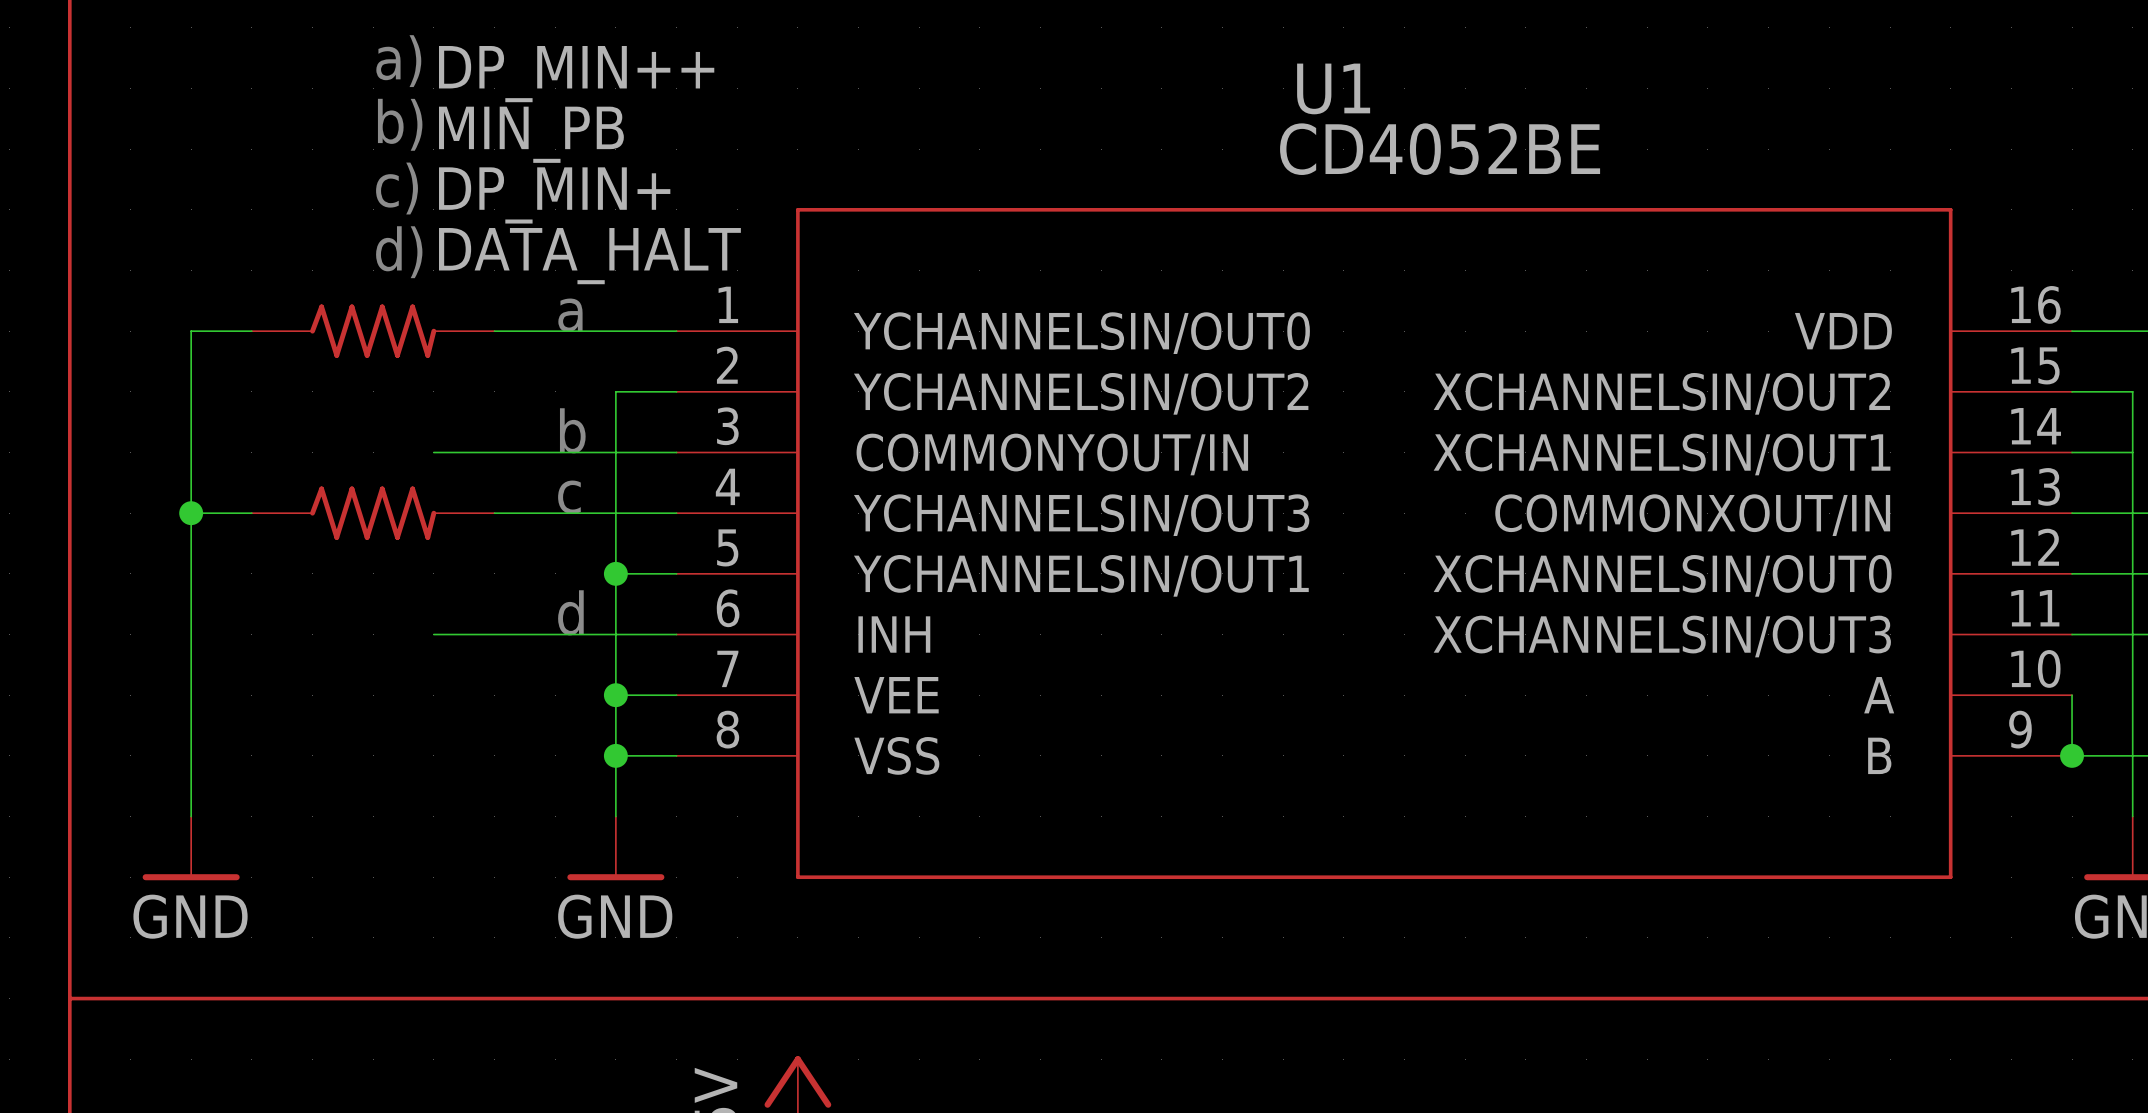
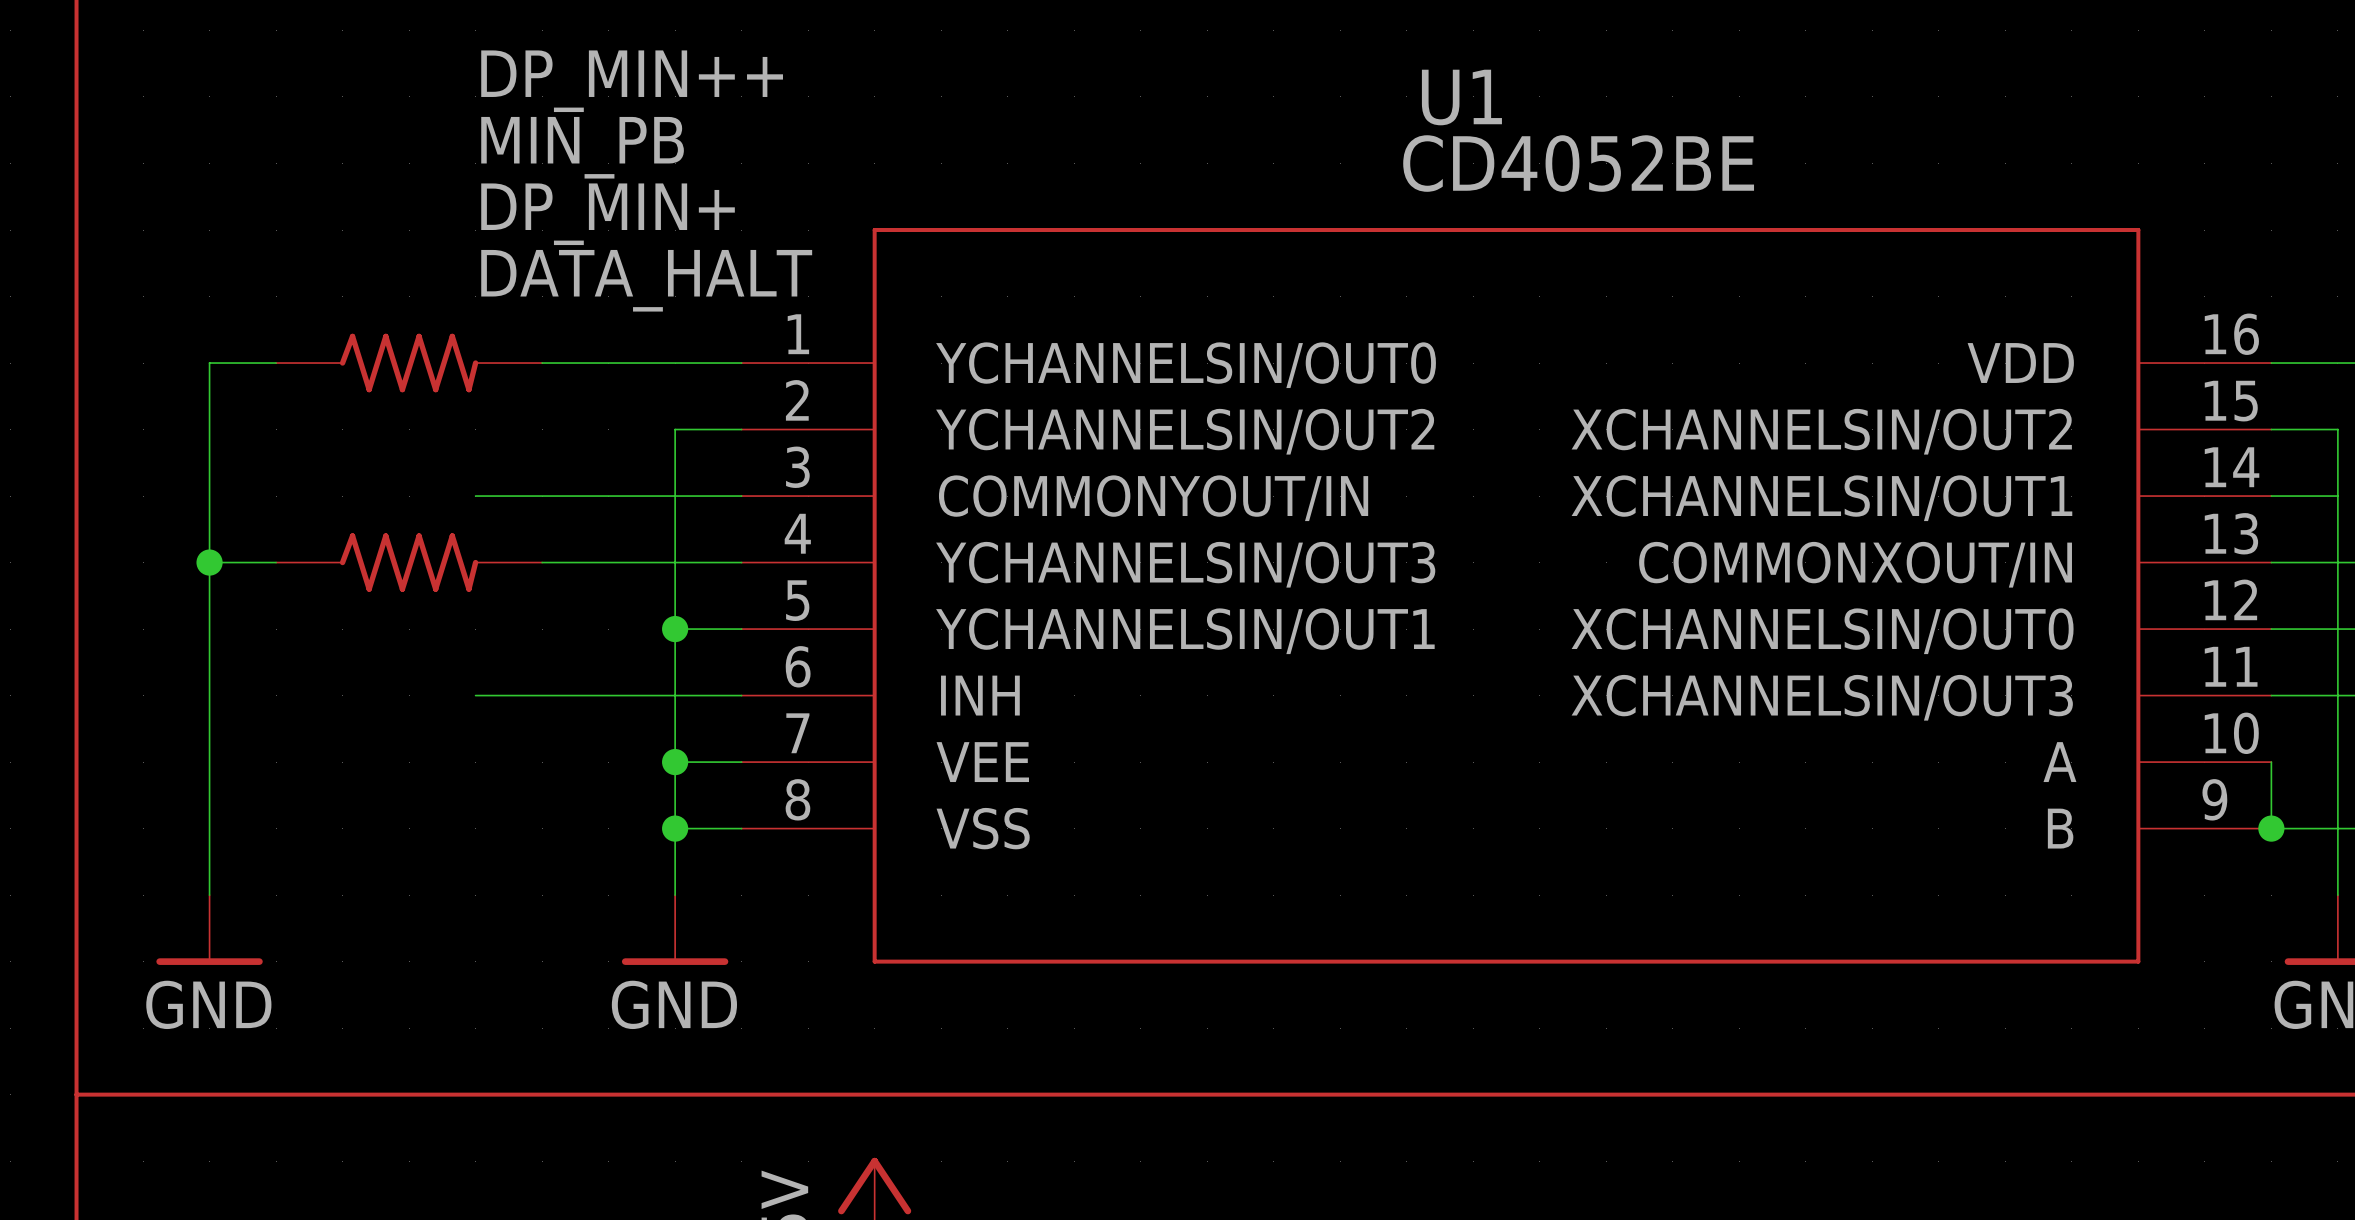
text: a) (398, 61) -> none
text: b) (400, 124) -> none
text: c) (397, 188) -> none
text: d) (399, 252) -> none
text: a (570, 315) -> none
text: b (572, 430) -> none
text: c (569, 497) -> none
text: d (570, 612) -> none

